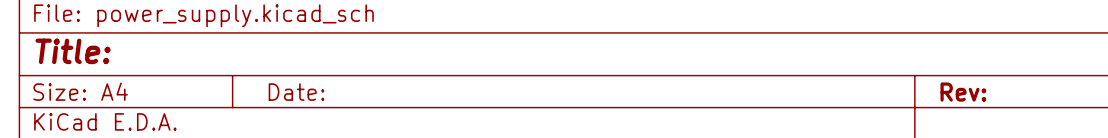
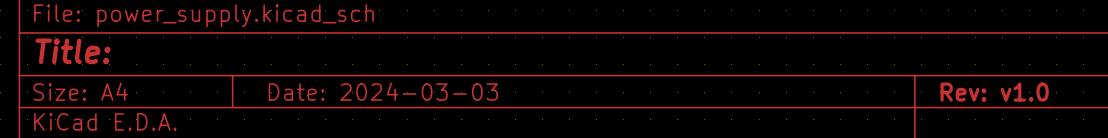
title block: Date: (296, 92) -> Date: 2024-03-03 (383, 91)
title block: Rev: (963, 92) -> Rev: v1.0 (994, 92)

